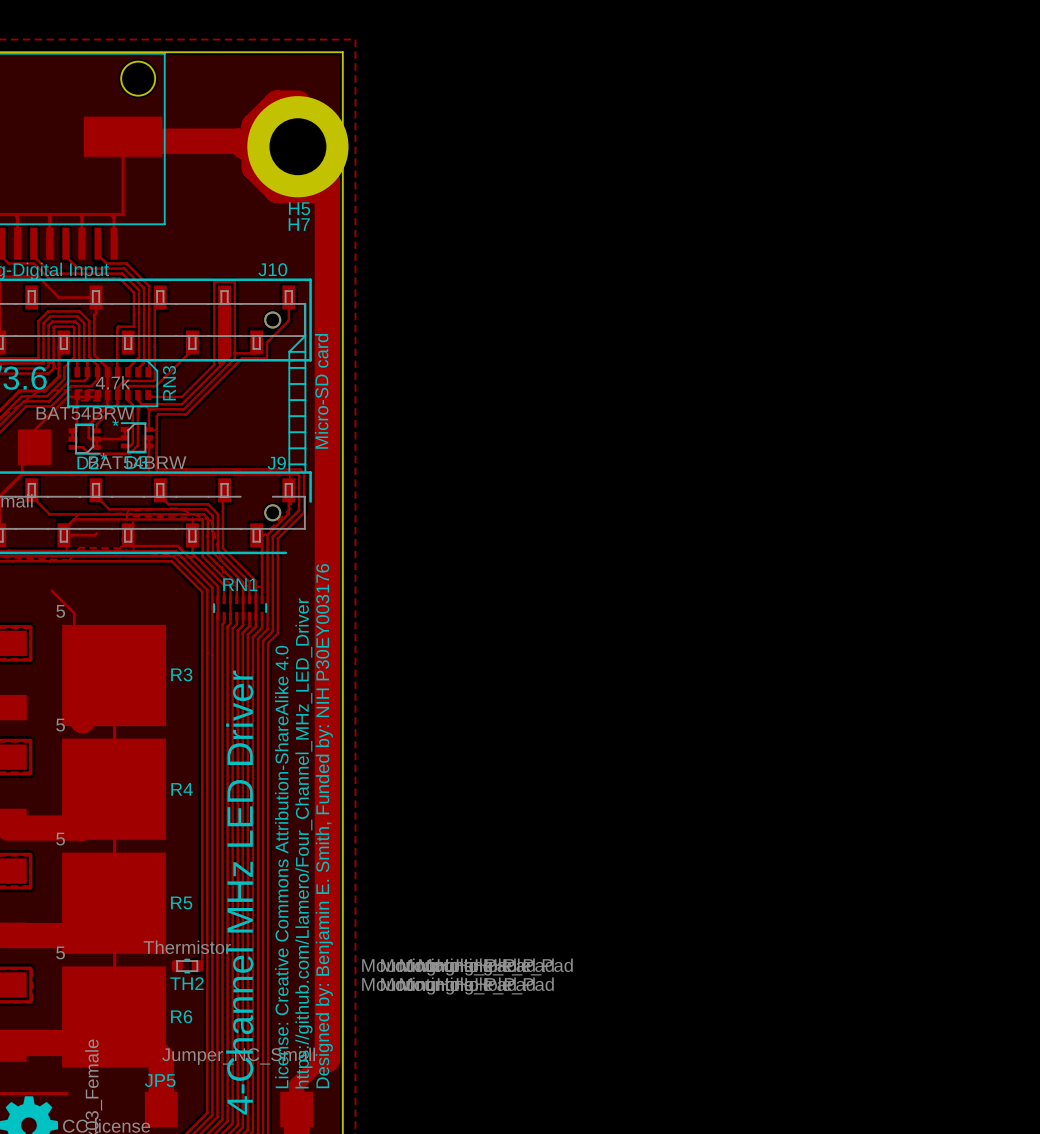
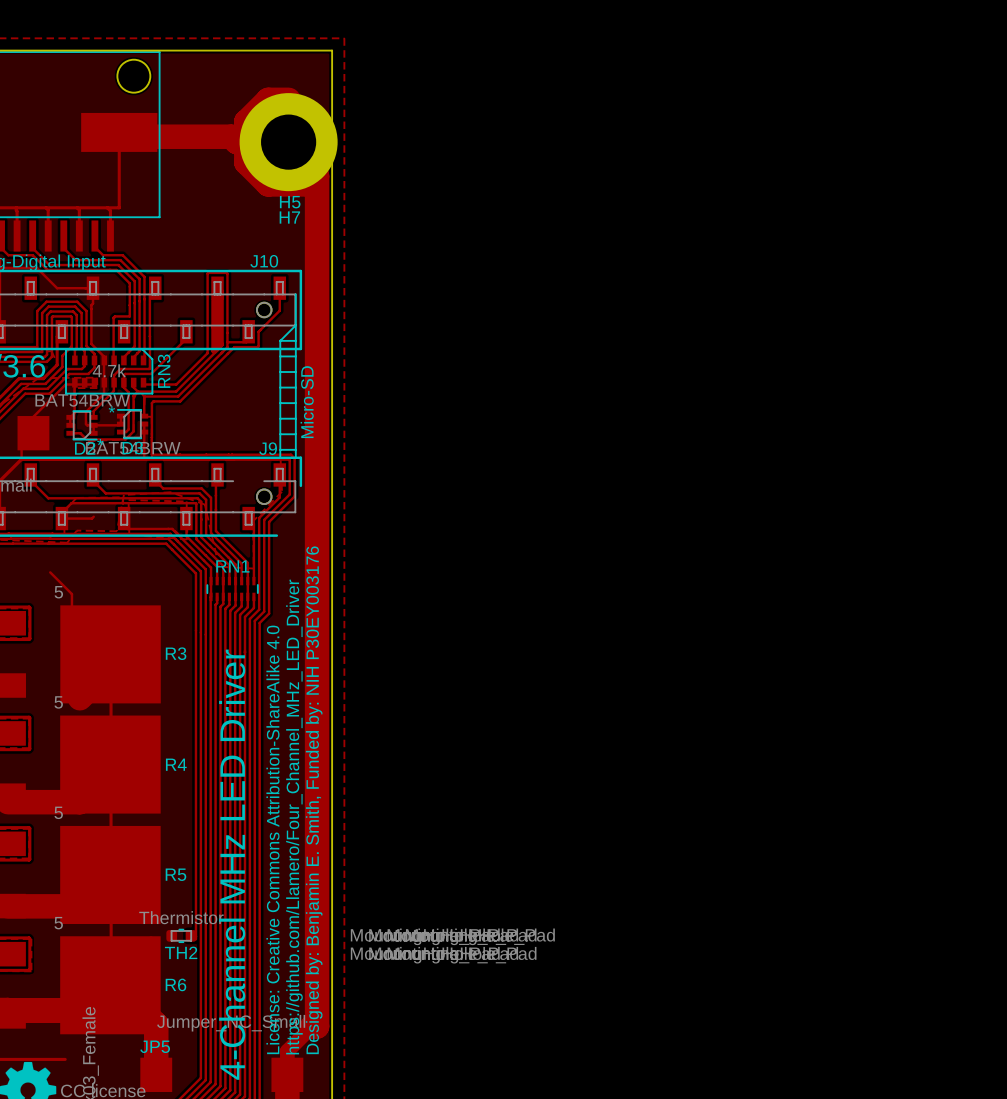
part text: Micro-SD card (321, 391) -> none
part text: none -> Micro-SD (307, 402)

